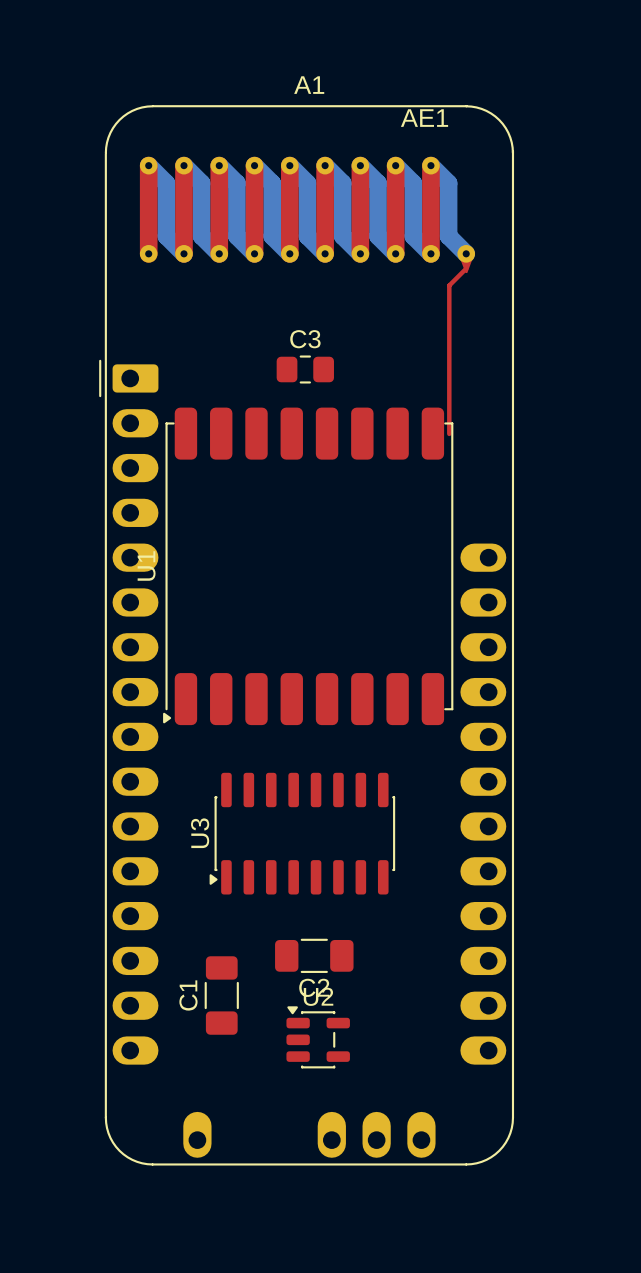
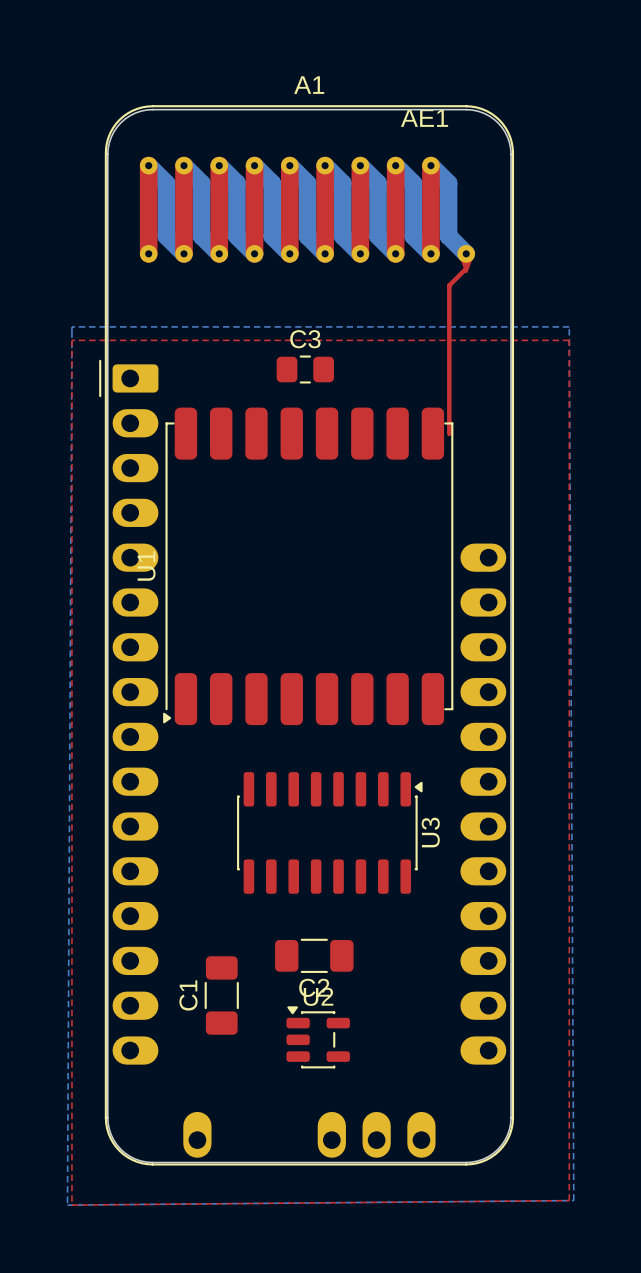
A1 footprint: [99, 105, 515, 1166] -> [99, 105, 515, 1166]
bottom zone outline: none -> (71, 326) (569, 326) (573, 1200) (67, 1205) (71, 326)
top zone outline: none -> (71, 340) (569, 340) (569, 1200) (71, 1205) (71, 340)
U3 rotation: 0° (302, 833) -> 180° (329, 832)

